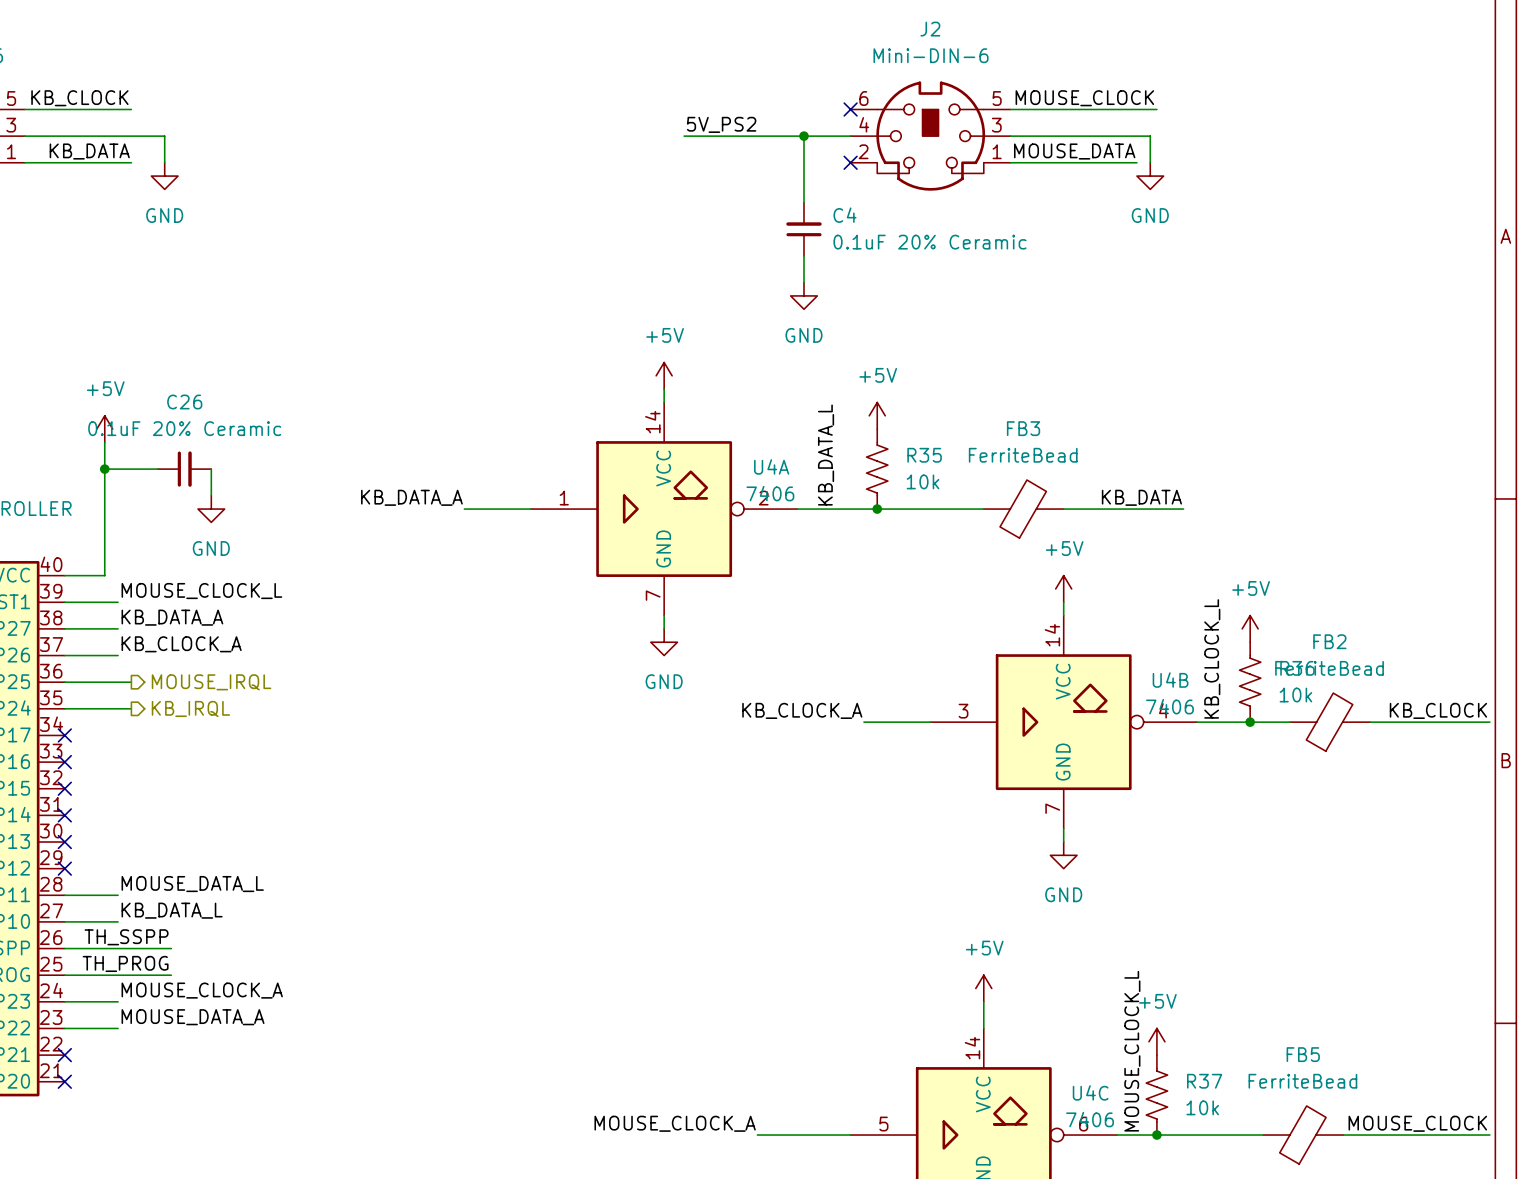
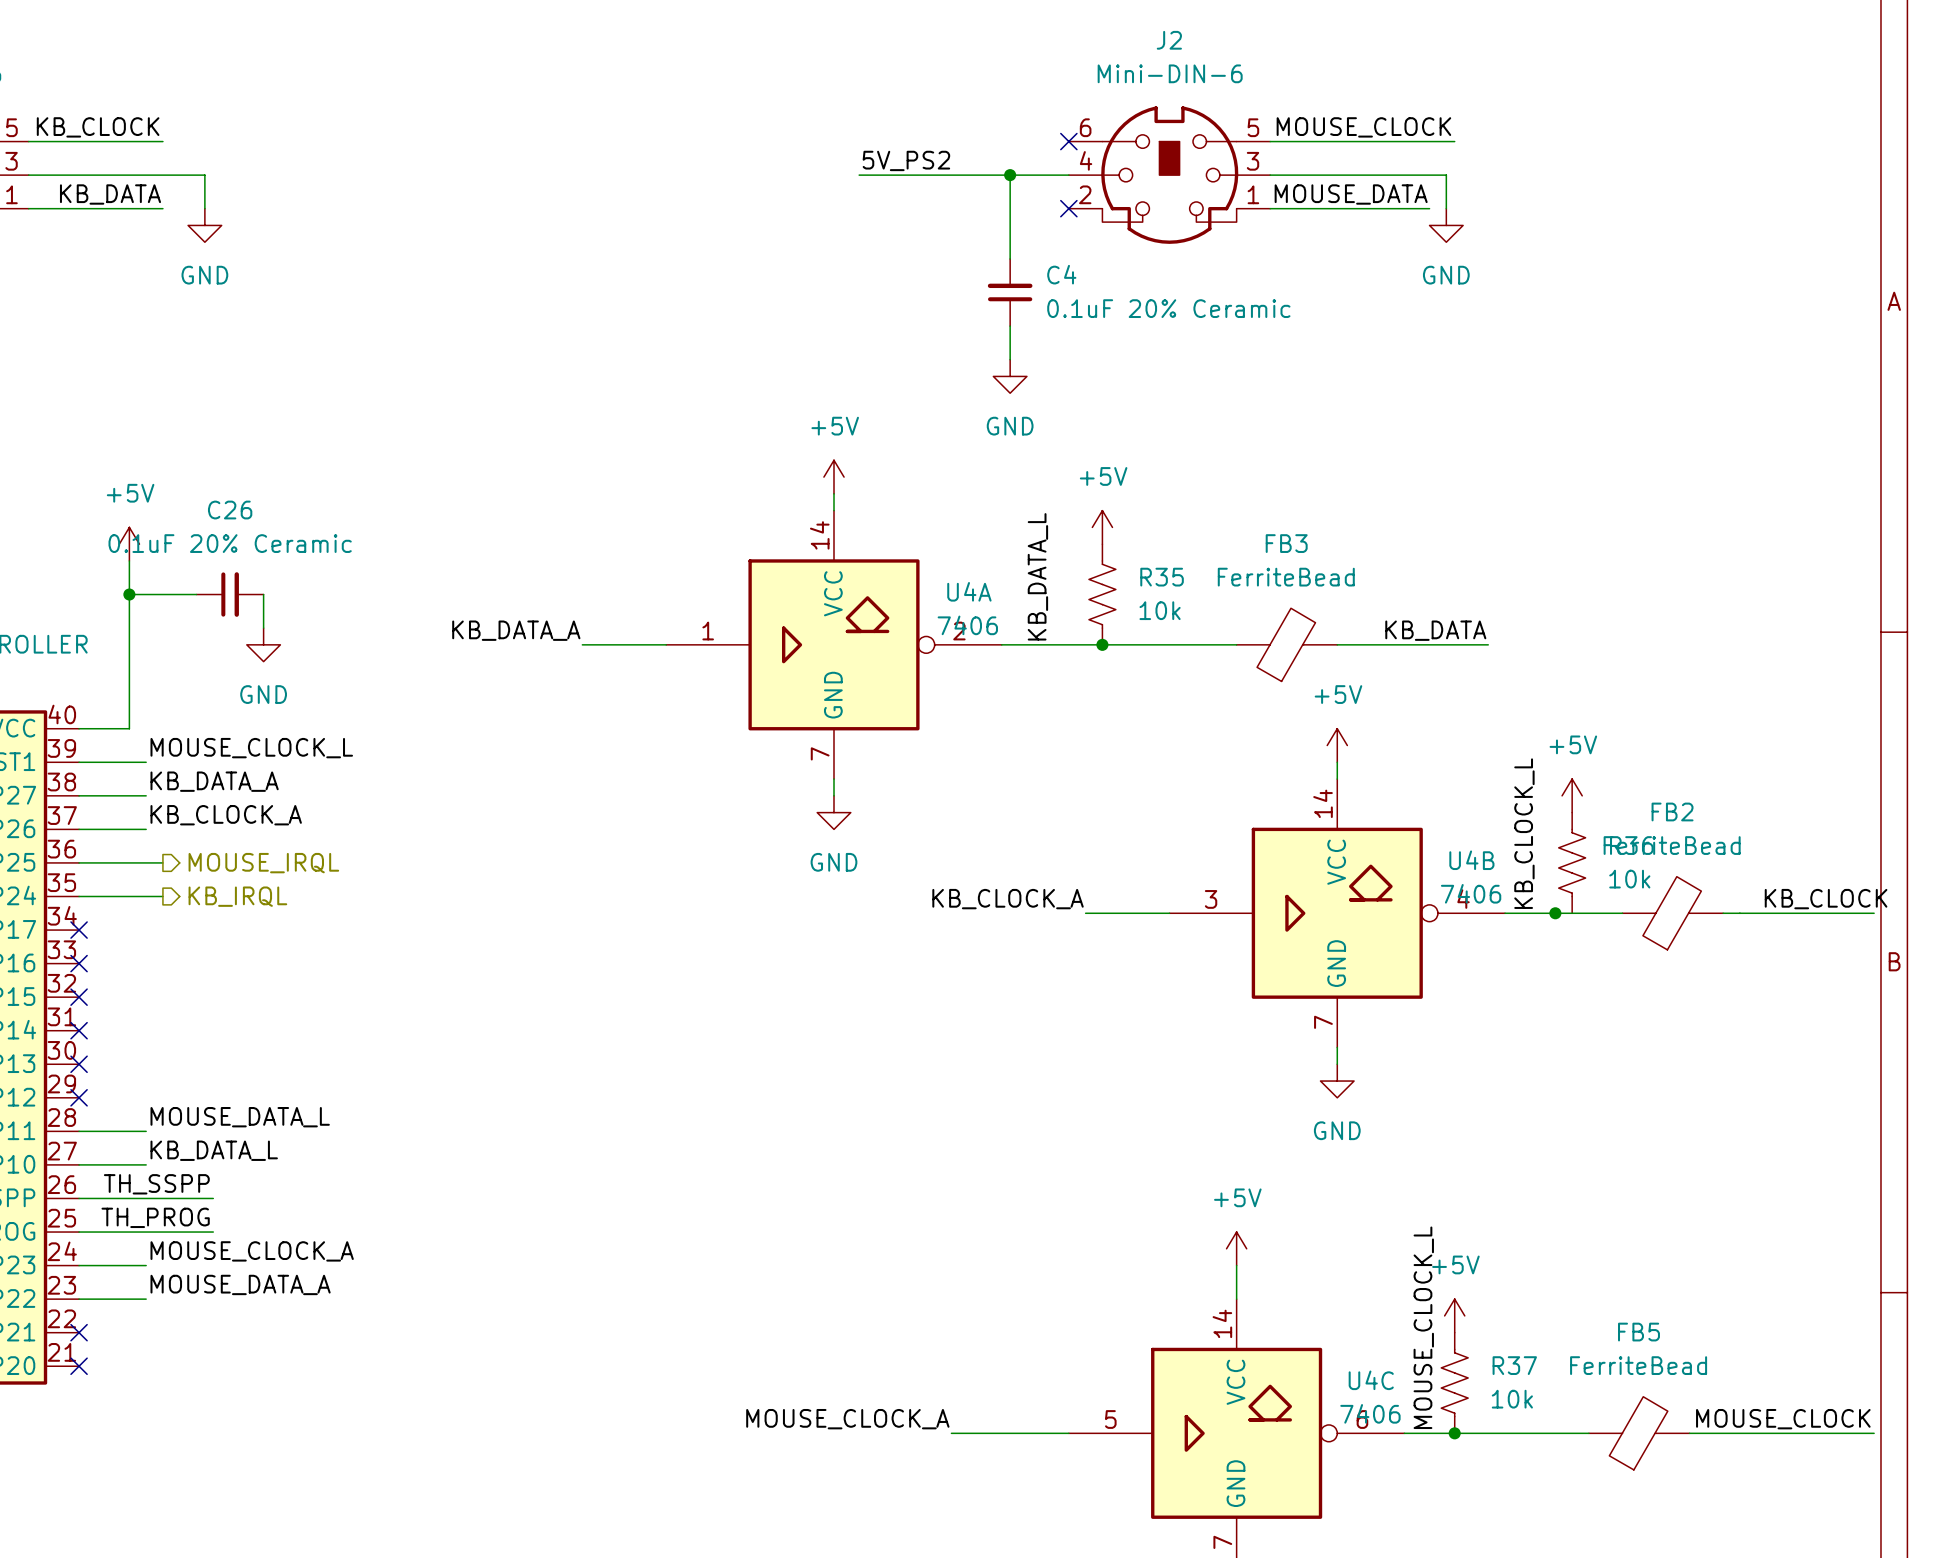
label position: KB_CLOCK (1438, 710) -> KB_CLOCK (1826, 899)
junction position: (1250, 722) -> (1555, 913)

